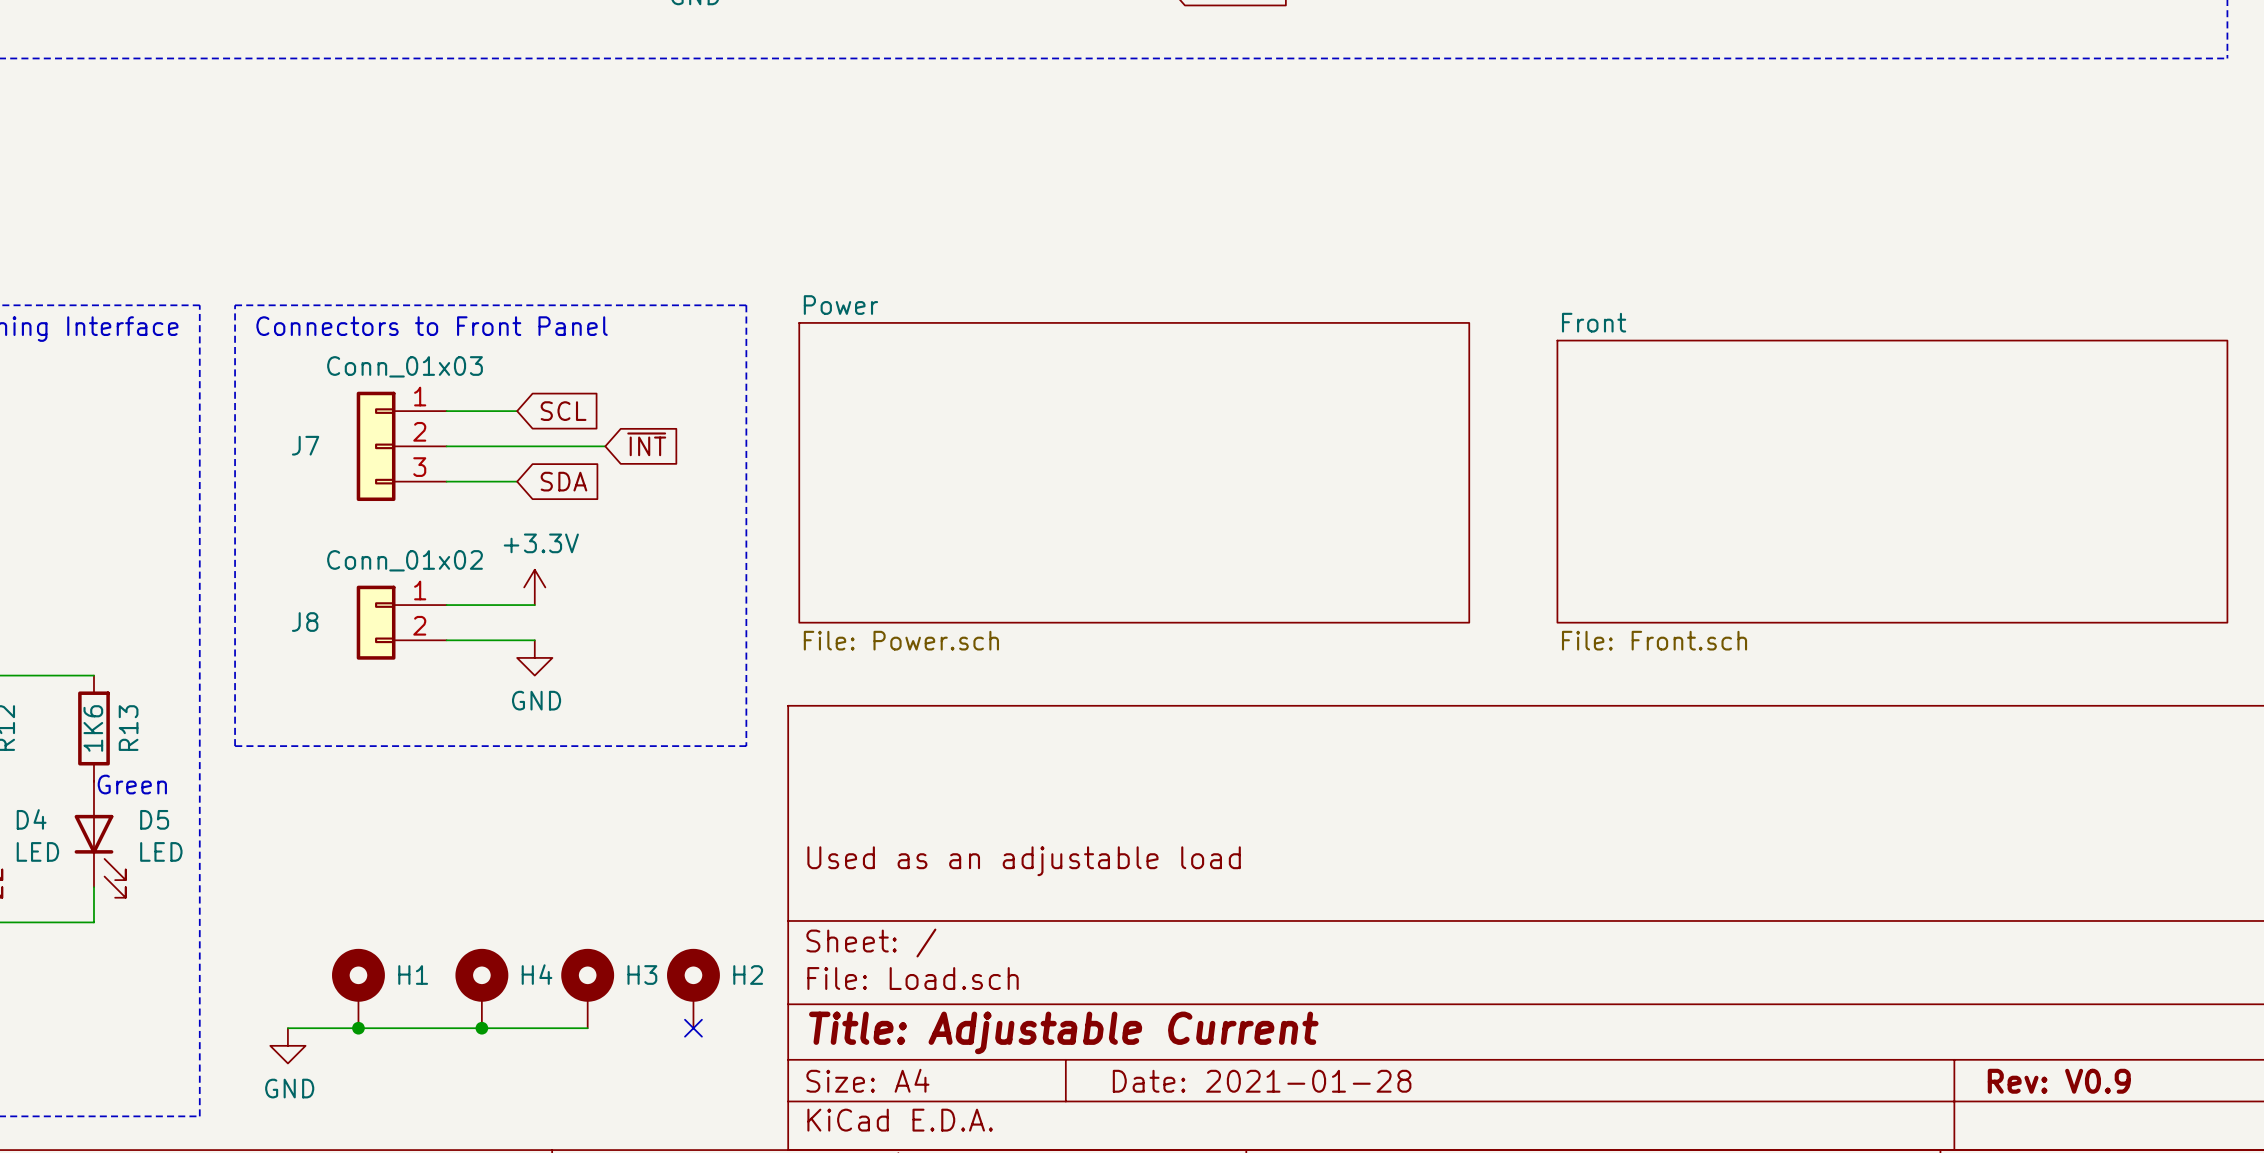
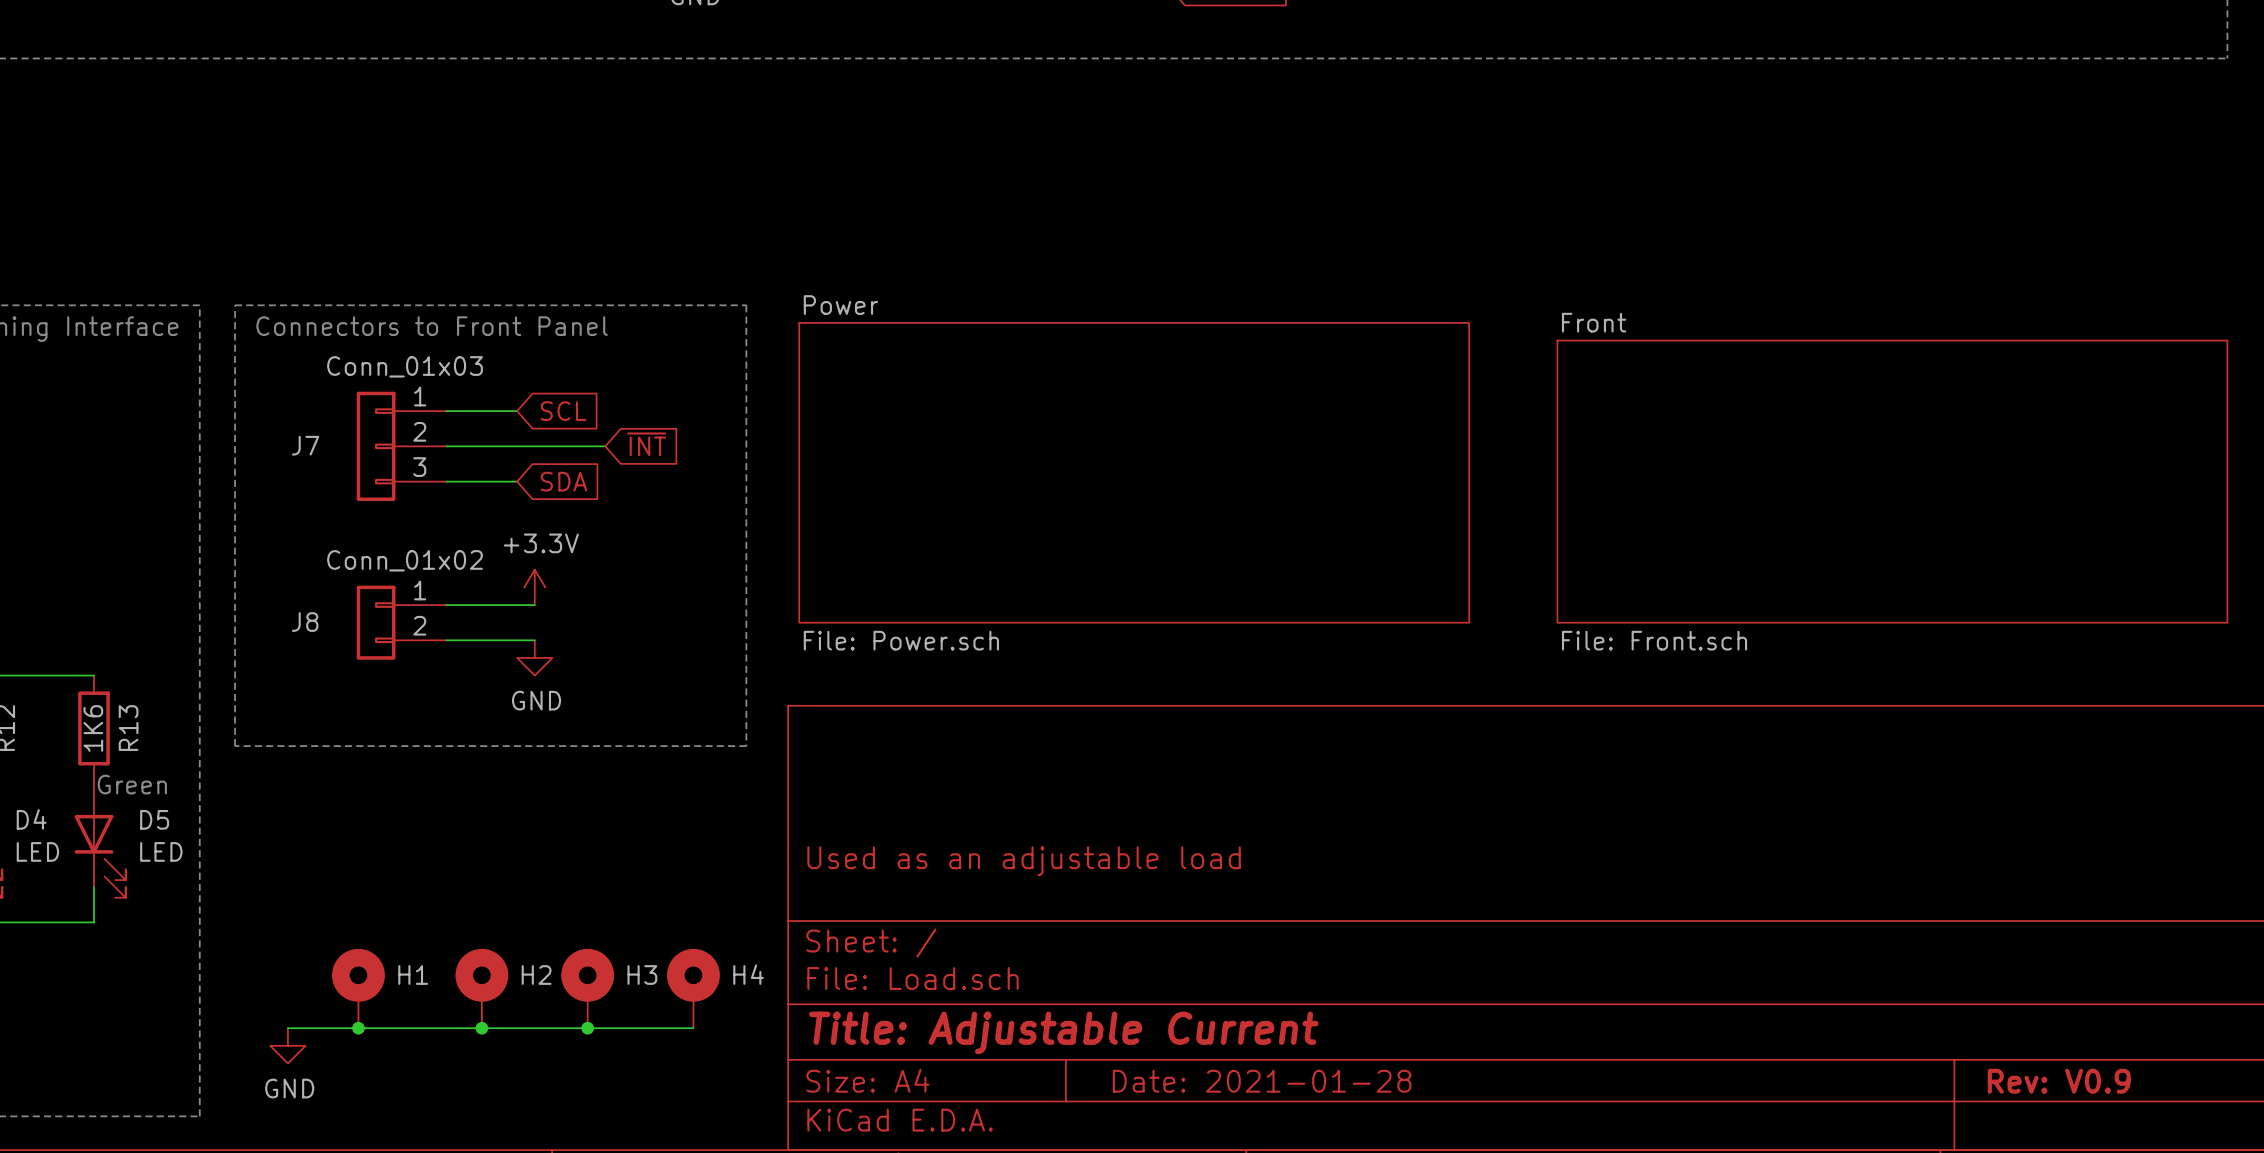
H4 name: H4 (537, 974) -> H2 (536, 975)
H2 name: H2 (748, 975) -> H4 (748, 974)
wire: none -> (587, 1028) (693, 1028)
junction: none -> (587, 1028)
no-connect mark: (693, 1028) -> none

